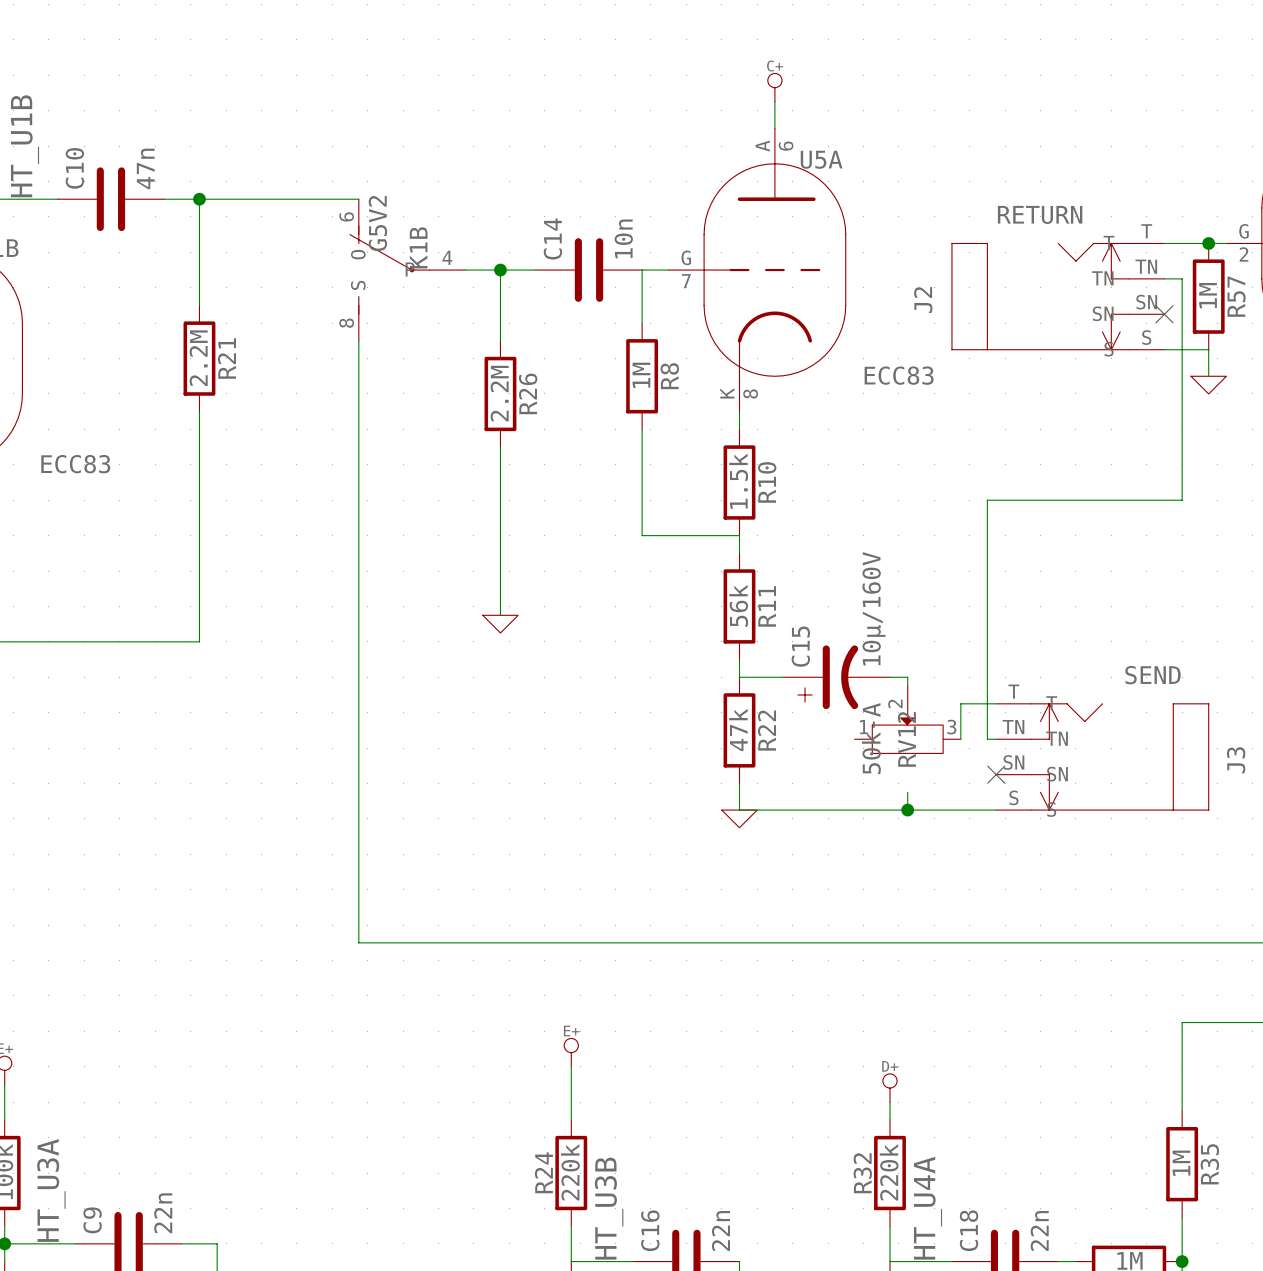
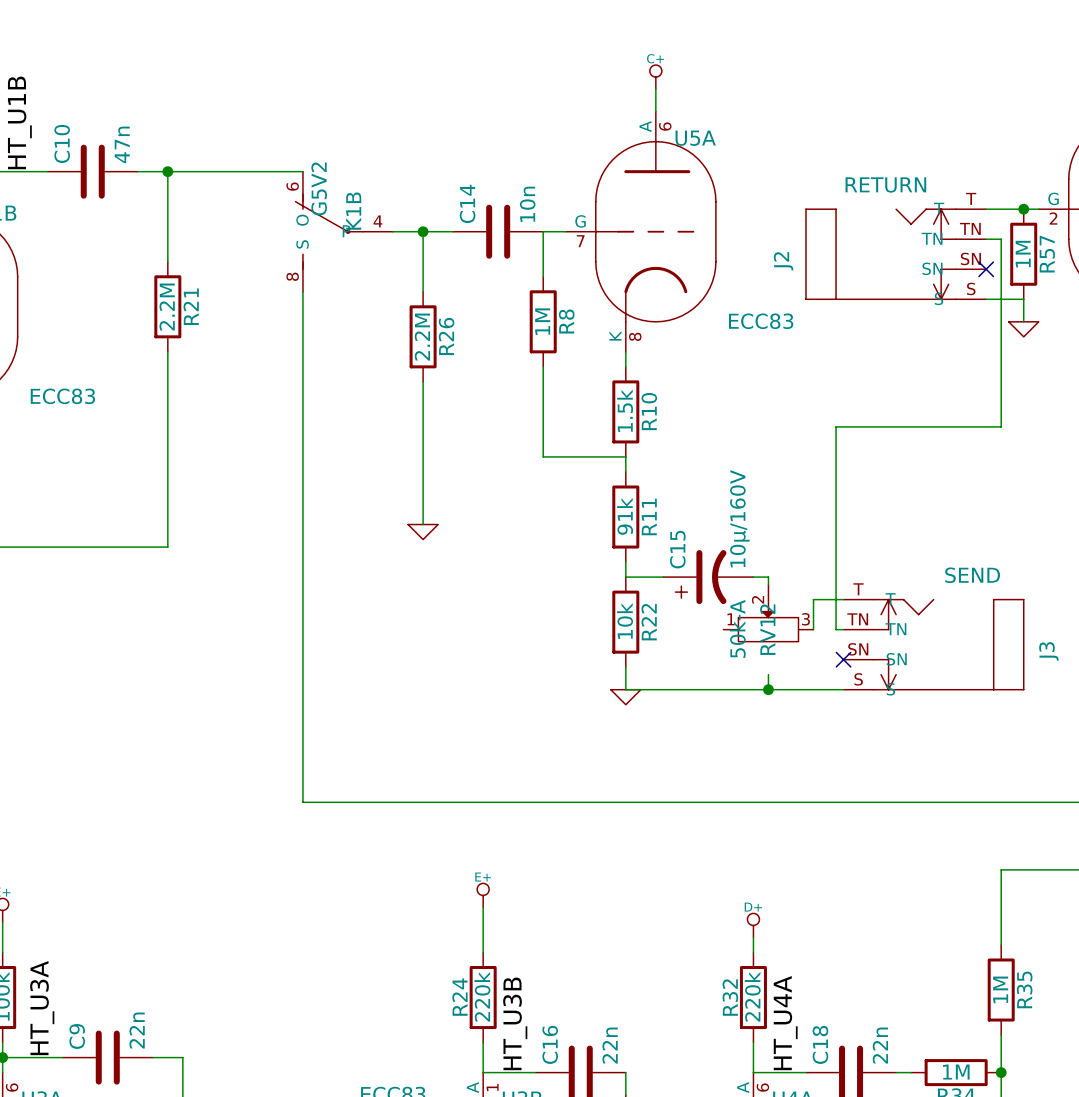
R11 value: 56k (738, 605) -> 91k (625, 516)
R22 value: 47k (738, 729) -> 10k (625, 621)

